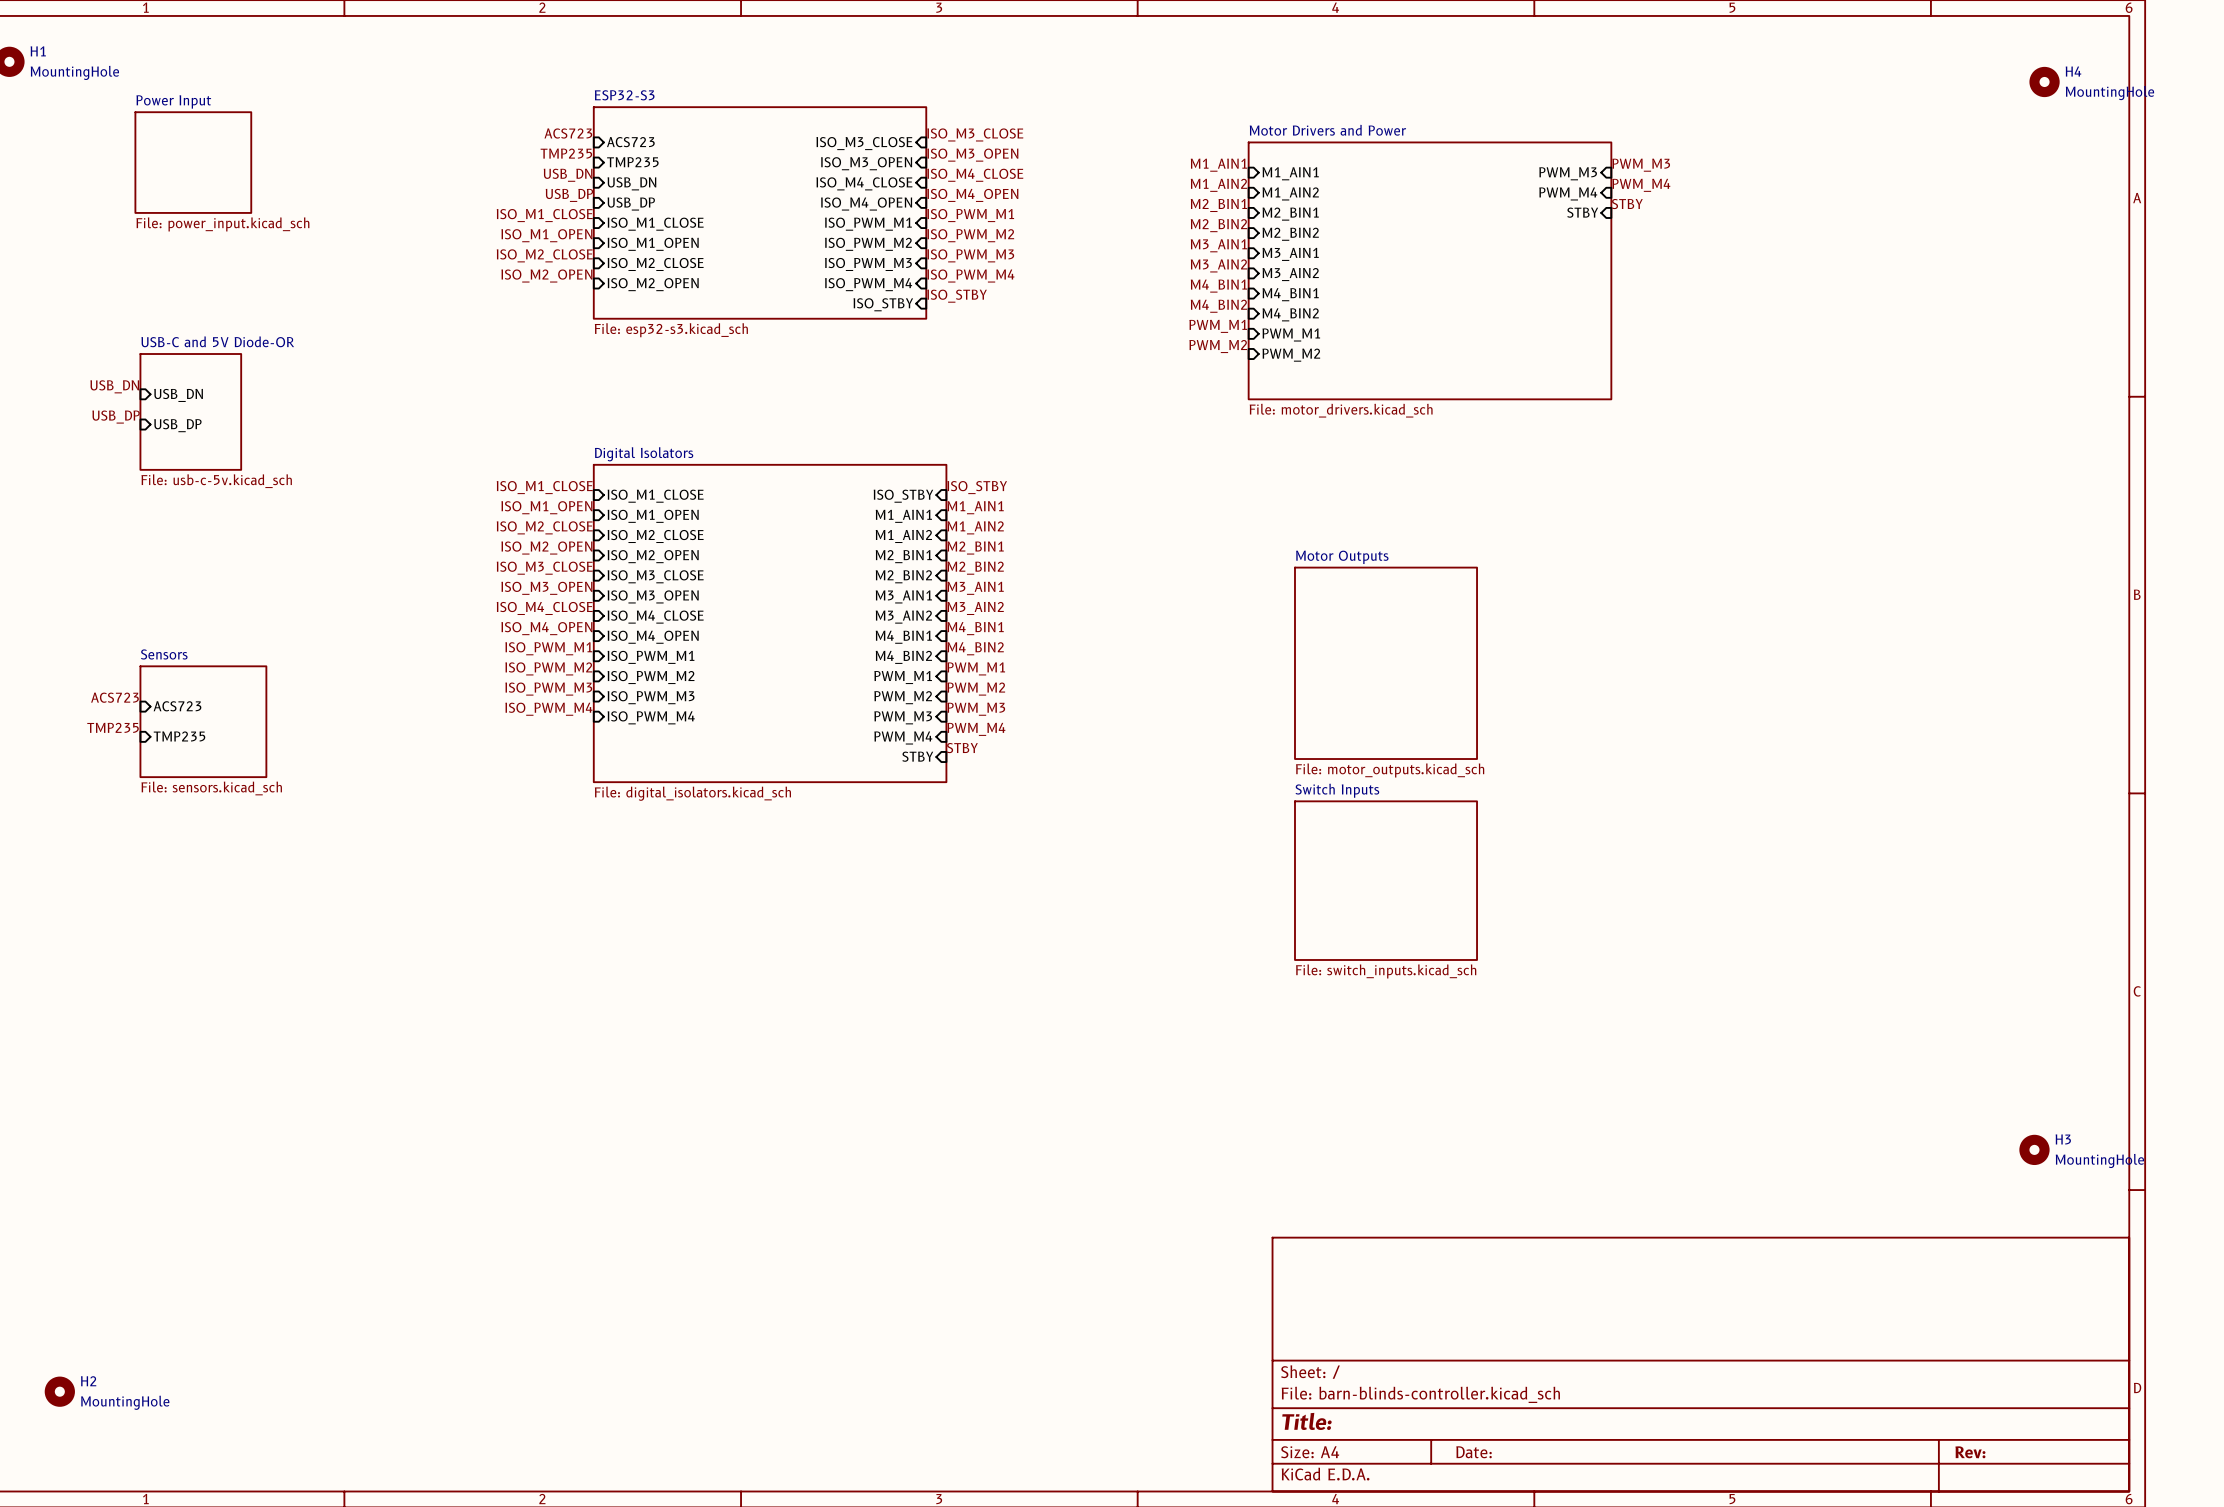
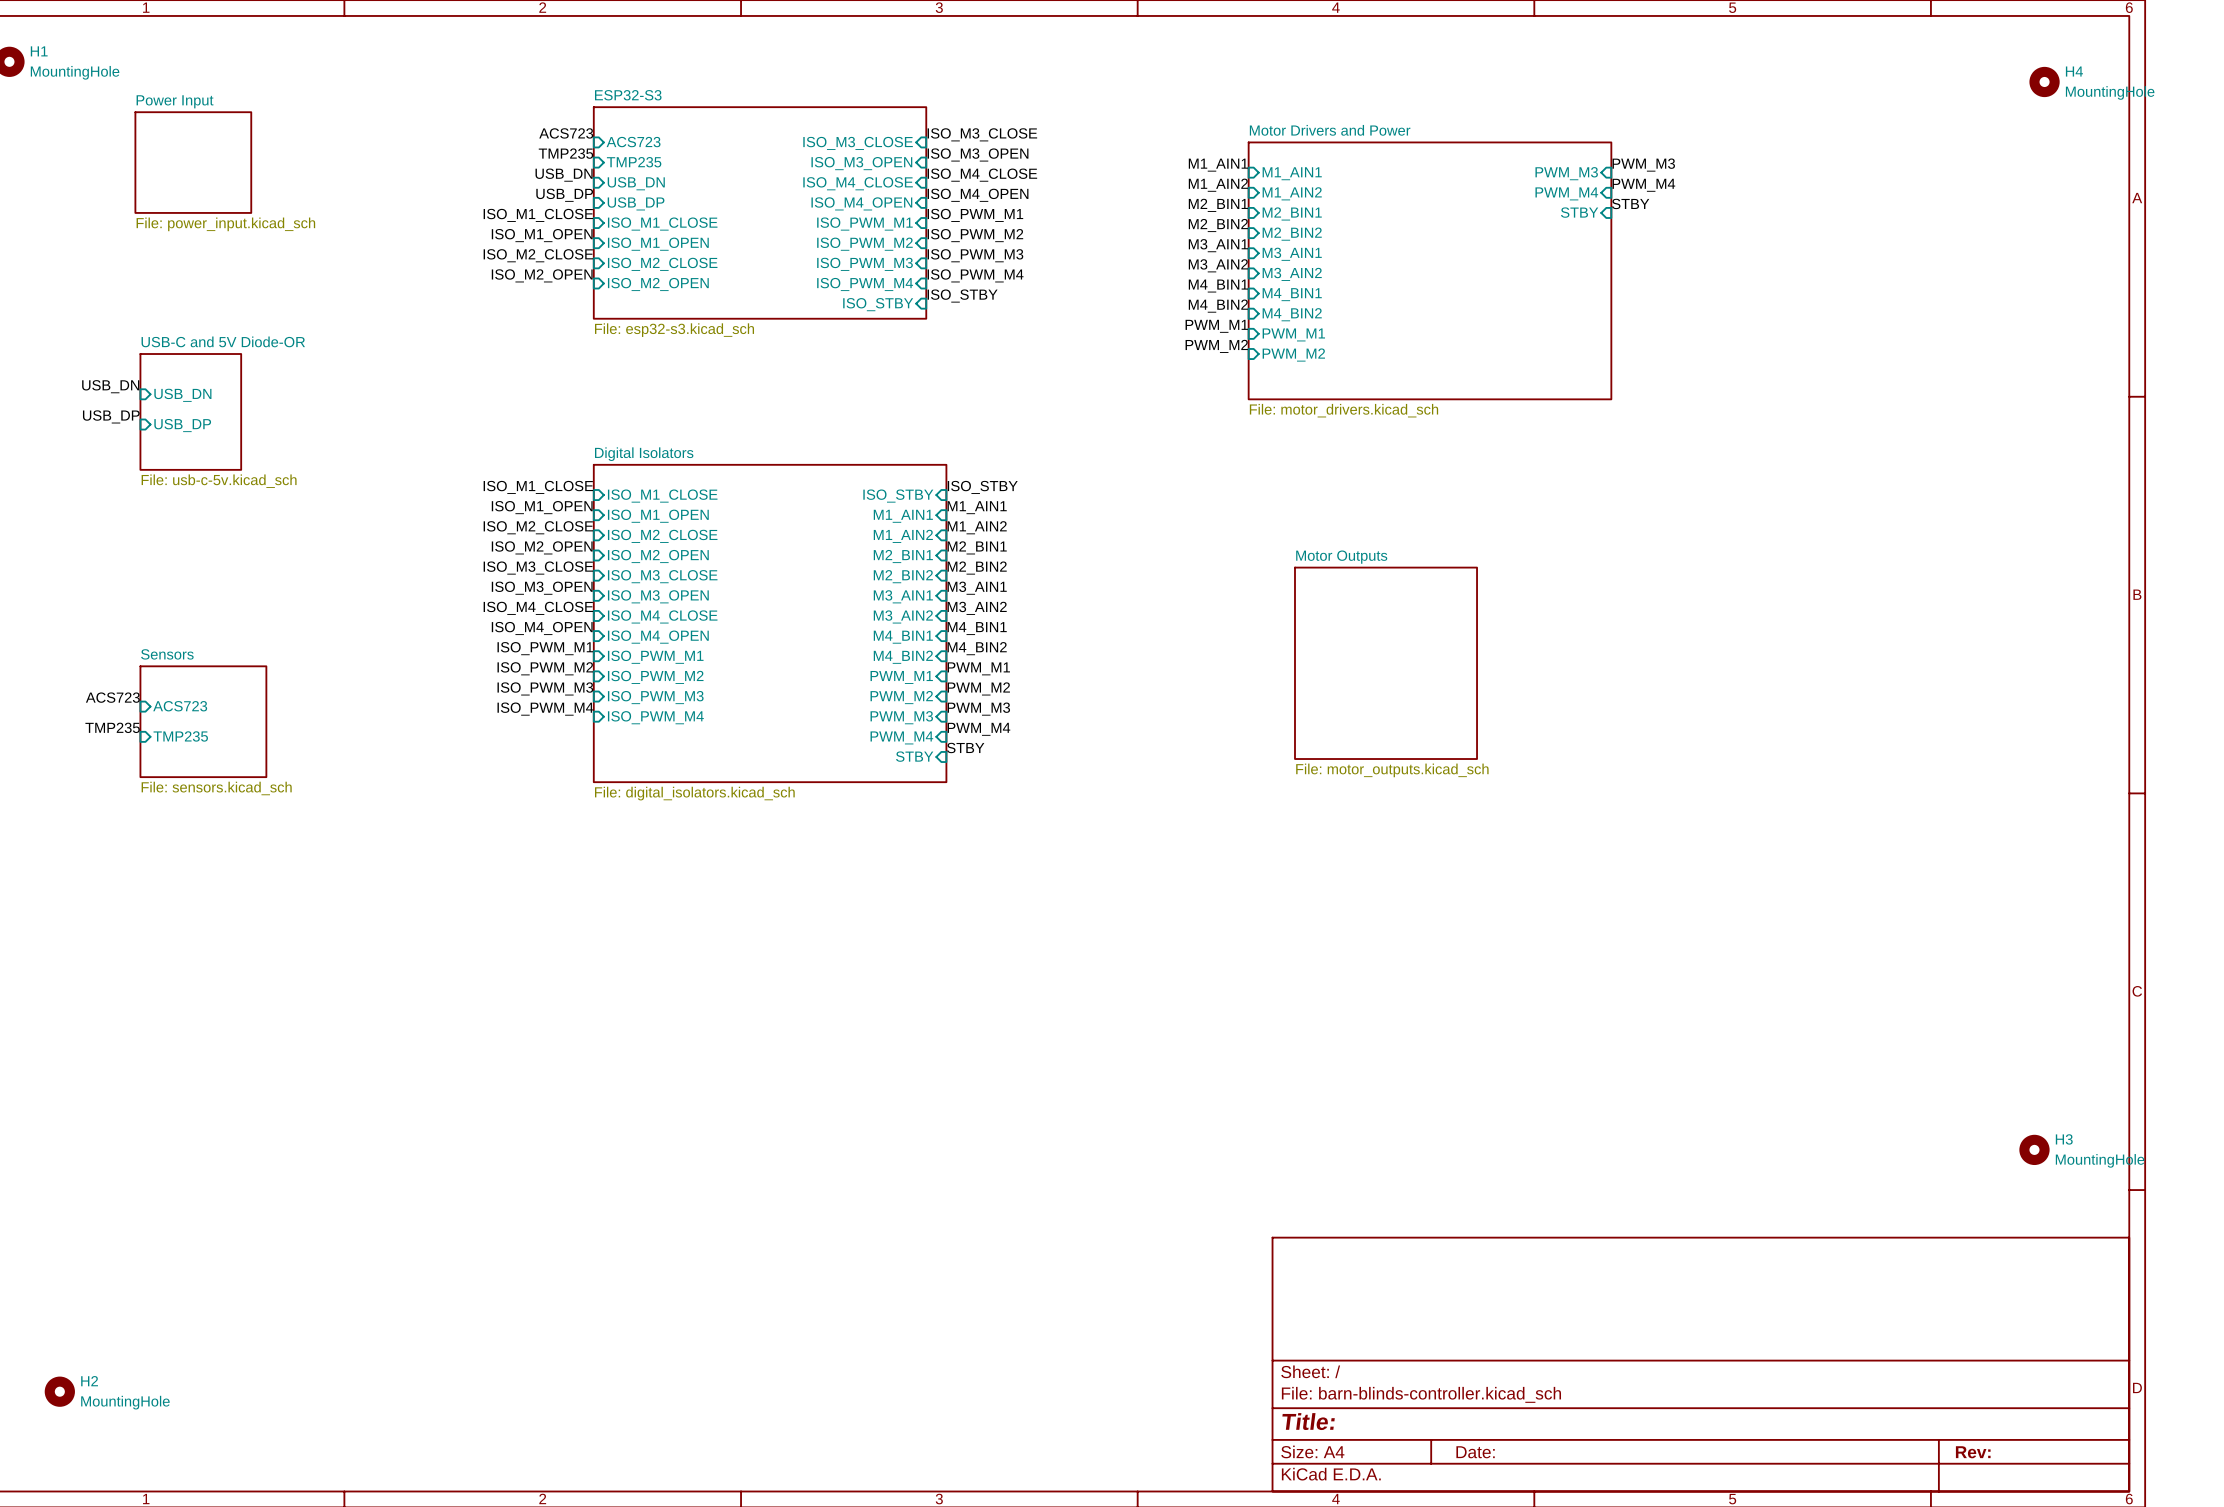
sheet Switch Inputs: File: switch_inputs.kicad_sch (1386, 880) -> none

